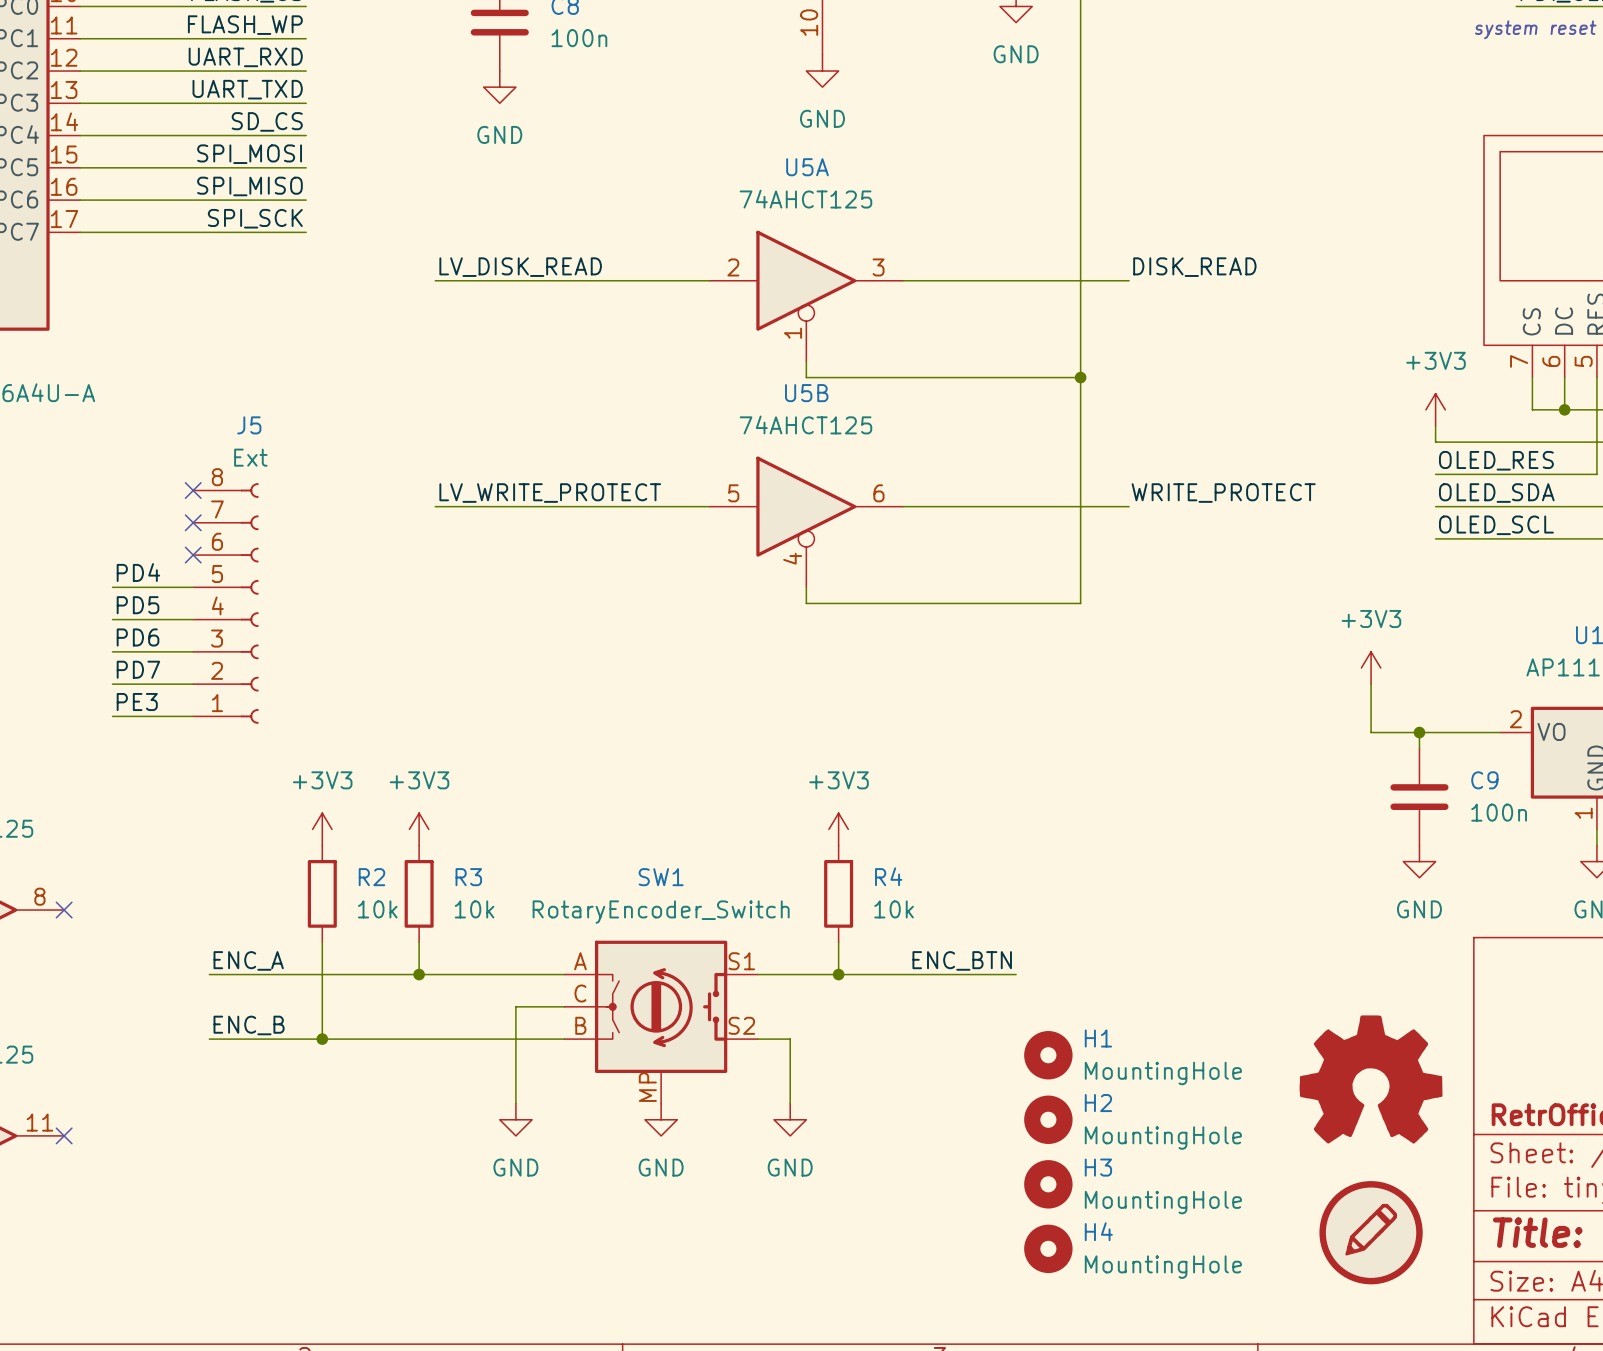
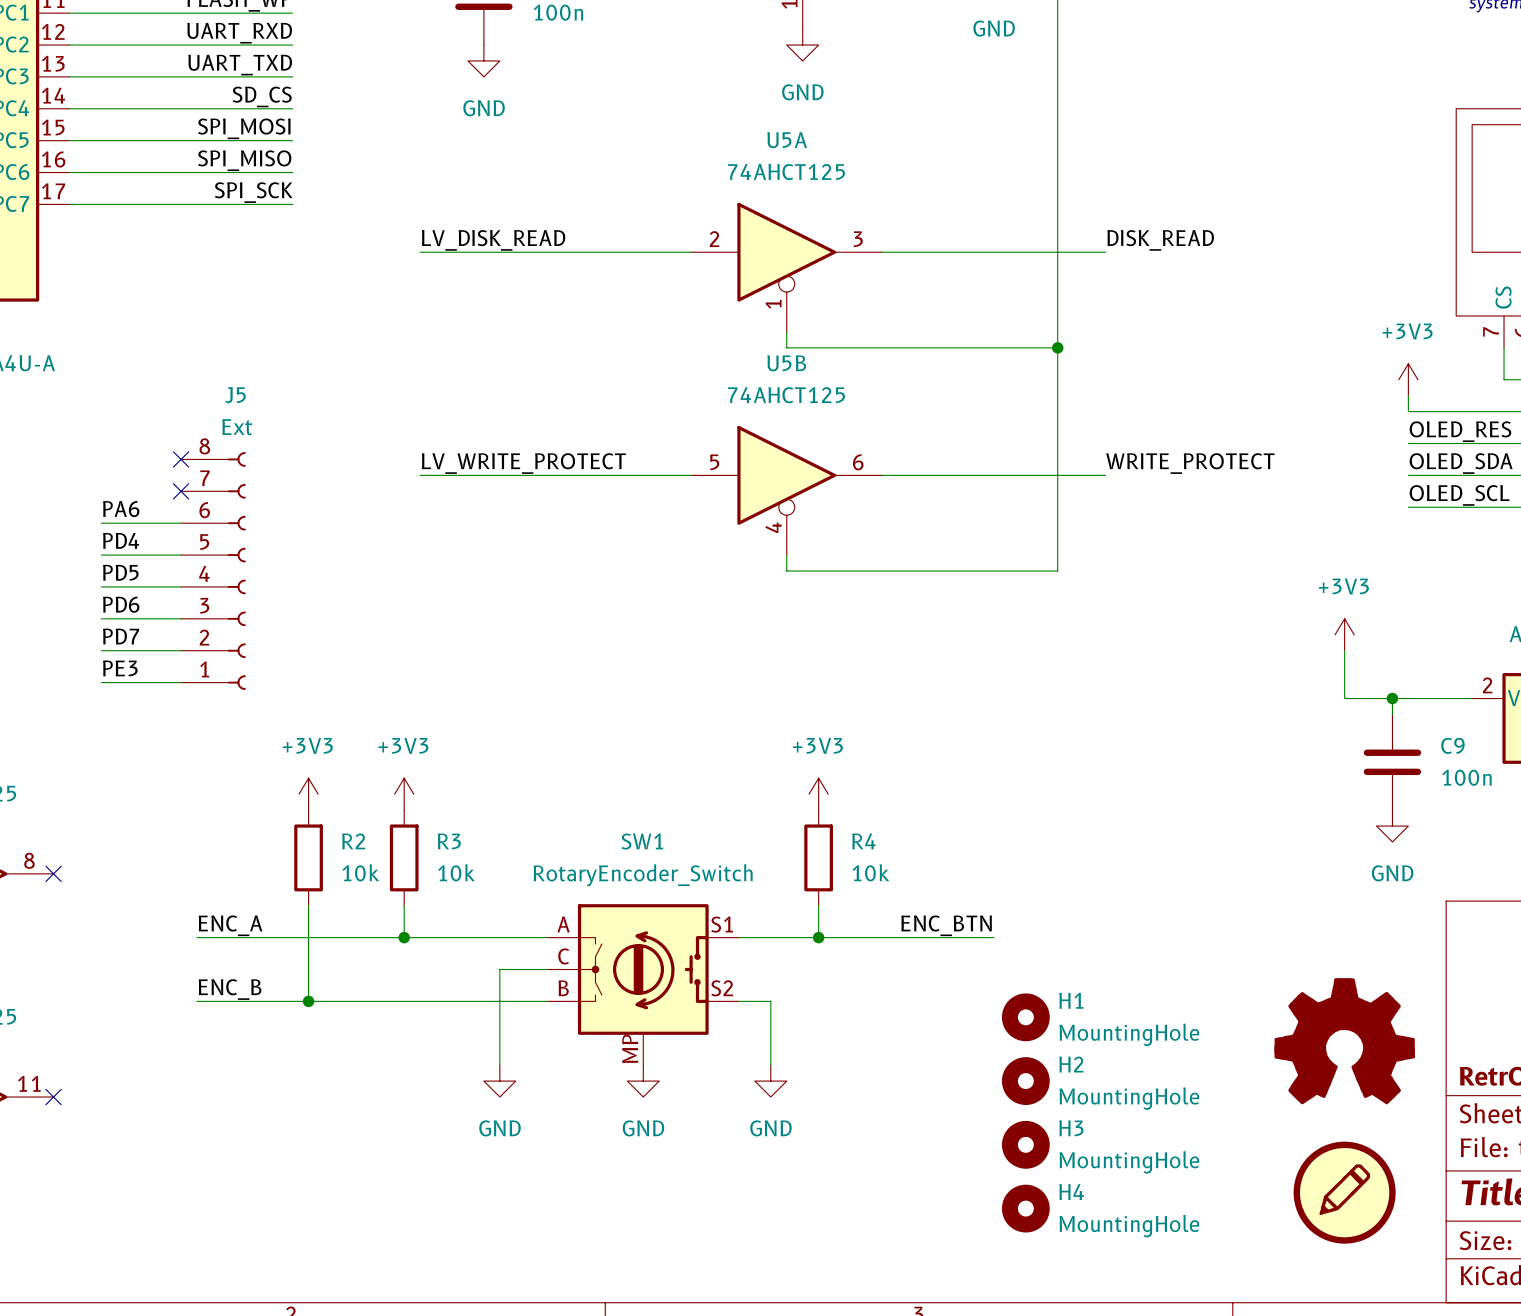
label: none -> PA6 (121, 509)
wire: none -> (101, 523) (181, 523)
no-connect mark: (193, 555) -> none

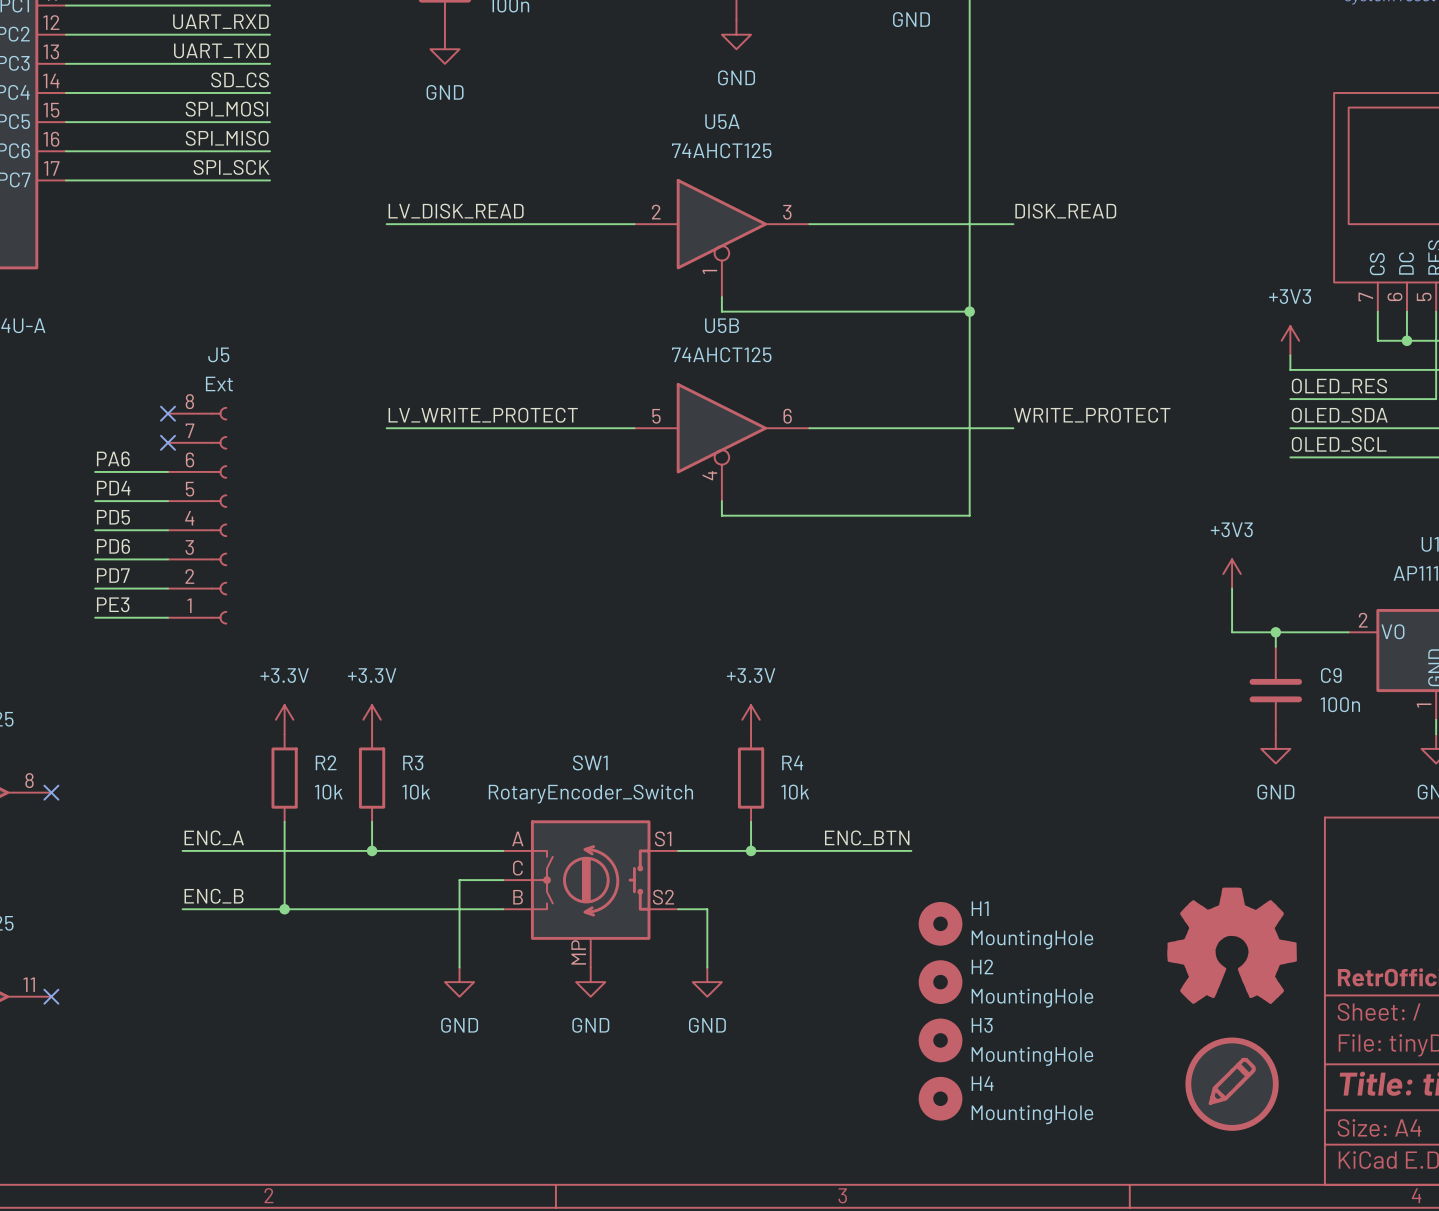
power symbol: +3V3 (308, 794) -> +3.3V (284, 719)
power symbol: +3V3 (404, 794) -> +3.3V (372, 719)
power symbol: +3V3 (818, 794) -> +3.3V (751, 719)

